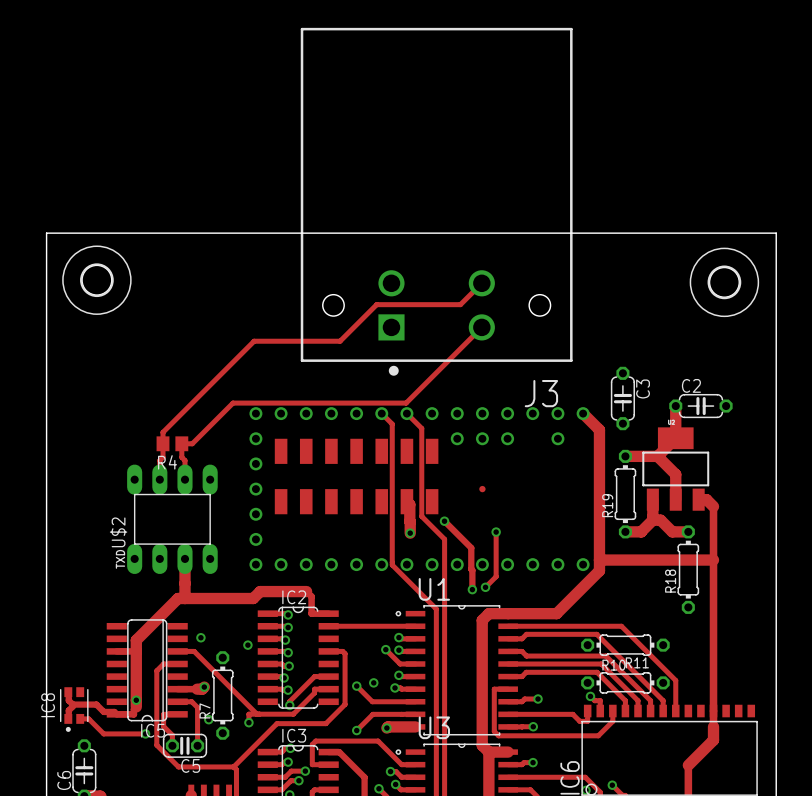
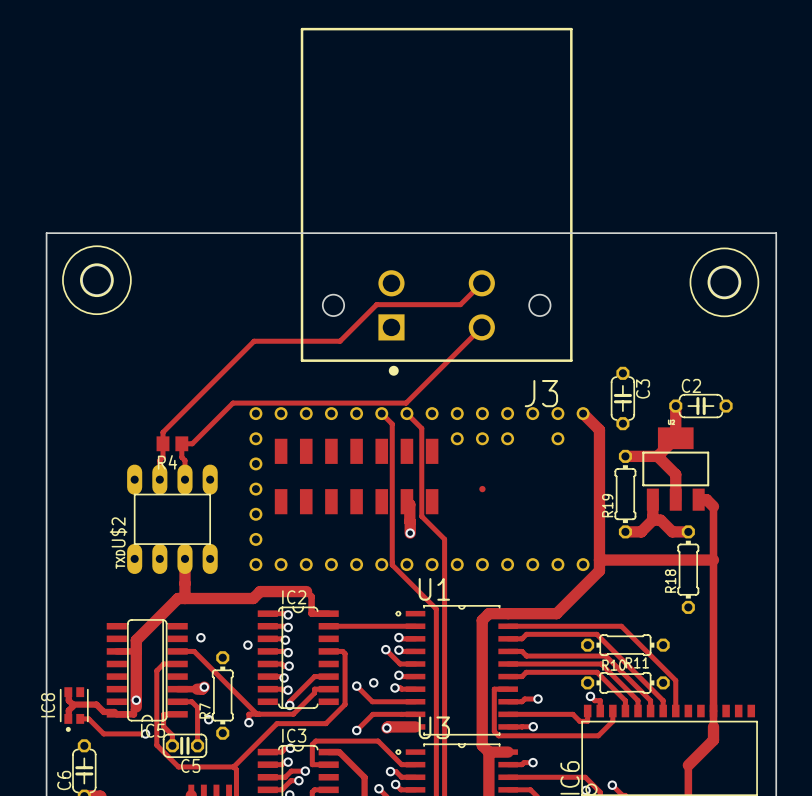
track: (444, 521) (471, 547) (472, 589) -> none
via: (444, 521) -> none
track: (496, 532) (496, 576) (485, 587) -> none
via: (496, 532) -> none
via: (485, 587) -> none
via: (472, 589) -> none

